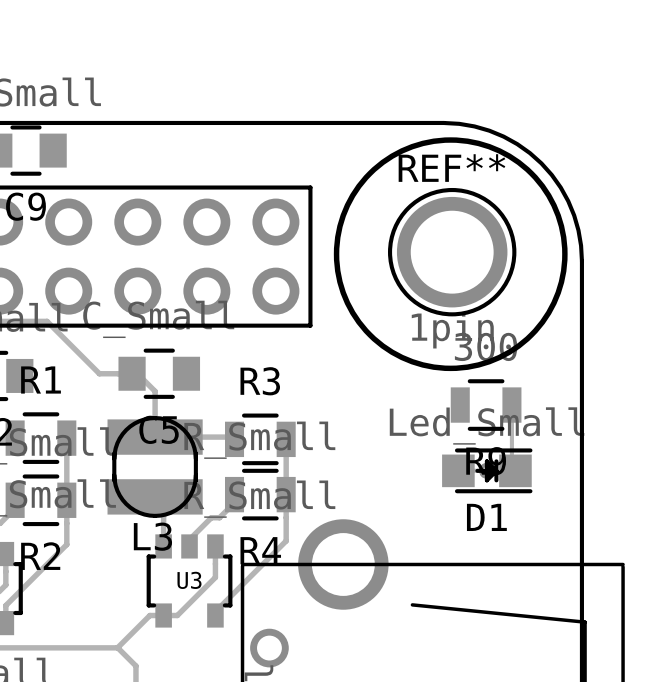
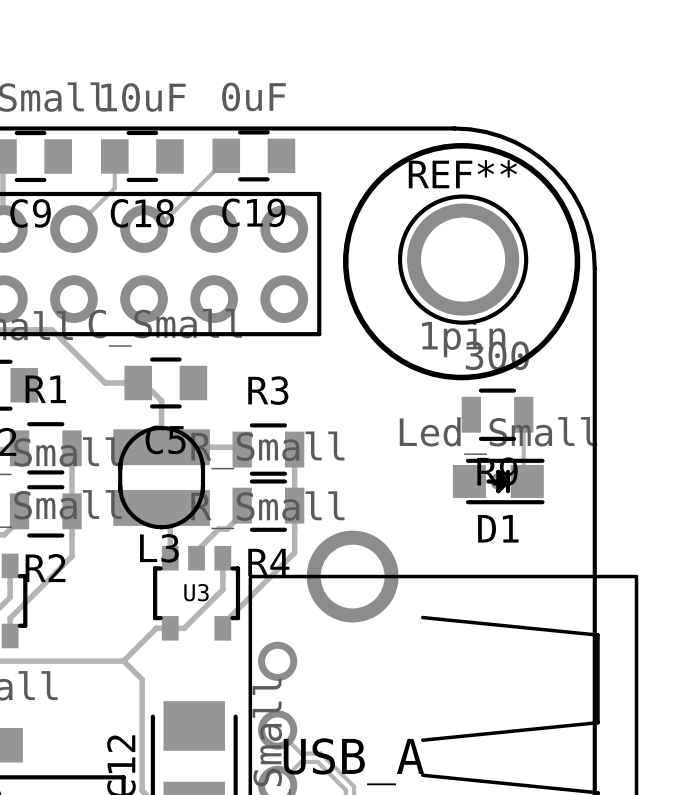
track: none -> (226, 155) (226, 159) (156, 229) (144, 229)
C19: none -> 0uF (253, 155)
track: none -> (114, 156) (114, 188) (73, 229)
C18: none -> 10uF (142, 156)

